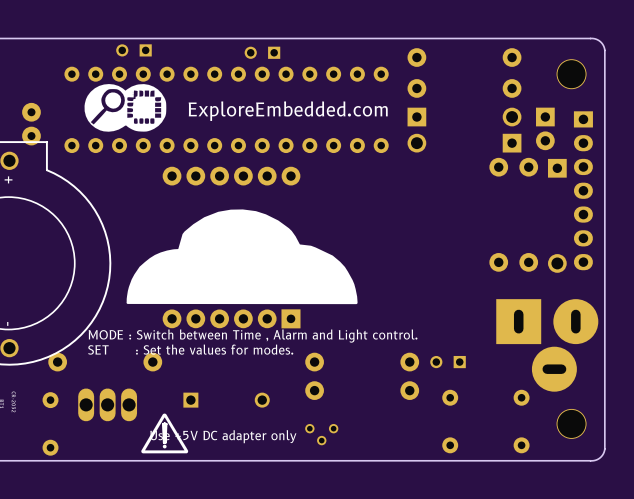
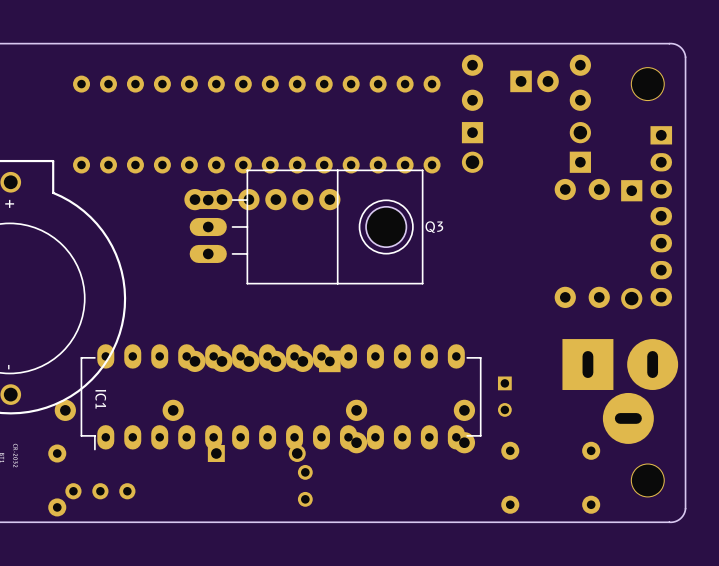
part: (133, 50) -> none
part: (262, 52) -> none
part: none -> (534, 81)
drawing: [84, 84, 167, 132] -> none
text: ExploreEmbedded.com (288, 111) -> none
part: (31, 124) -> none
part: (545, 128) -> none
Q3: none -> (306, 226)
drawing: [126, 209, 358, 305] -> none
text: MODE : Switch between Time , Alarm and Light control. (253, 336) -> none
text: SET : Set the values for modes. (190, 349) -> none
IC1: none -> (281, 397)
part rotation: 0° (448, 362) -> 90° counterclockwise (504, 396)
part: (107, 404) -> none
drawing: [141, 413, 189, 454] -> none
part: none -> (305, 485)
part: none -> (100, 491)
part: (321, 434) -> none
text: Use +5V DC adapter only (223, 436) -> none

